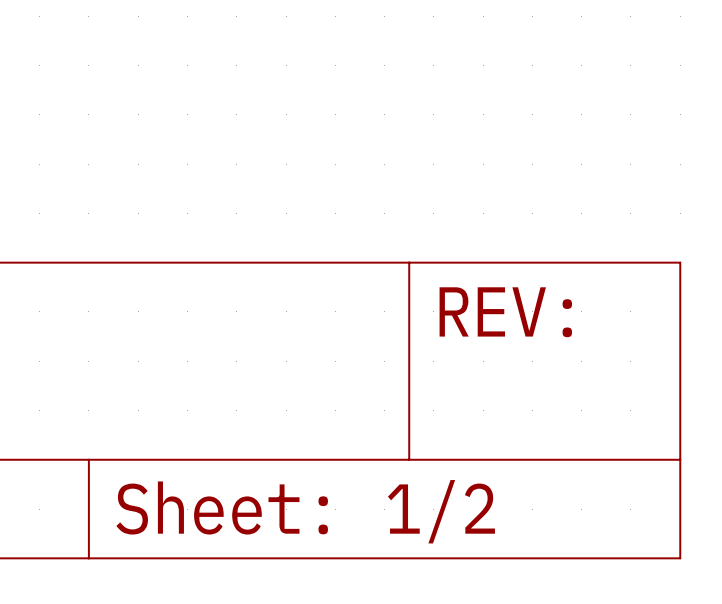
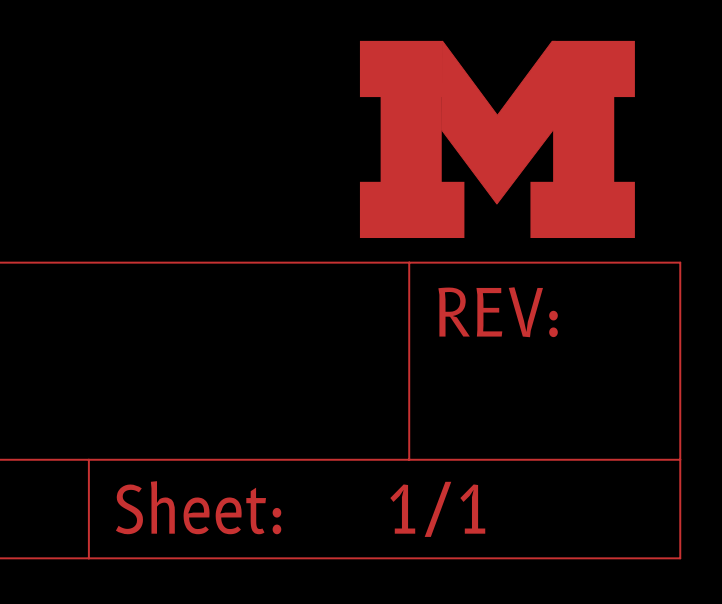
part: none -> (497, 139)
part text: 1/2 (441, 511) -> 1/1 (437, 509)

